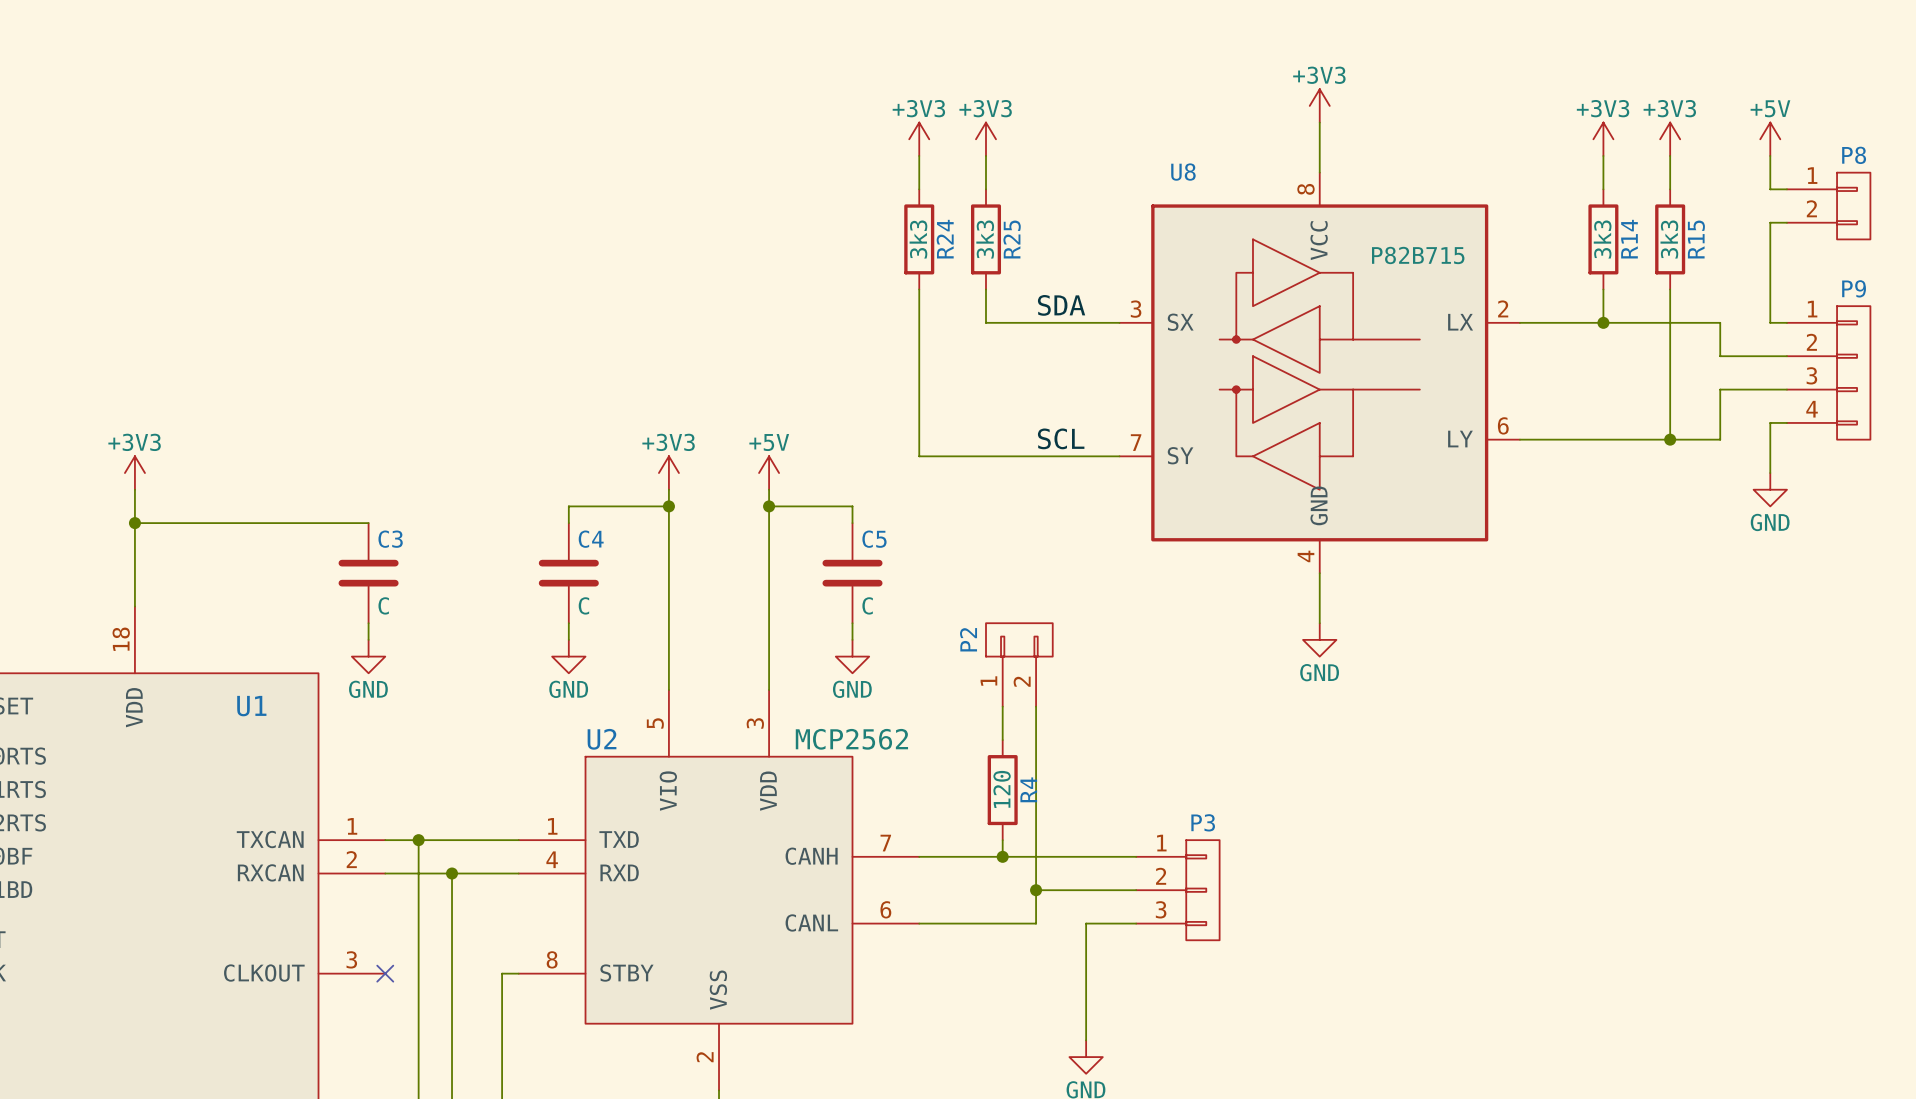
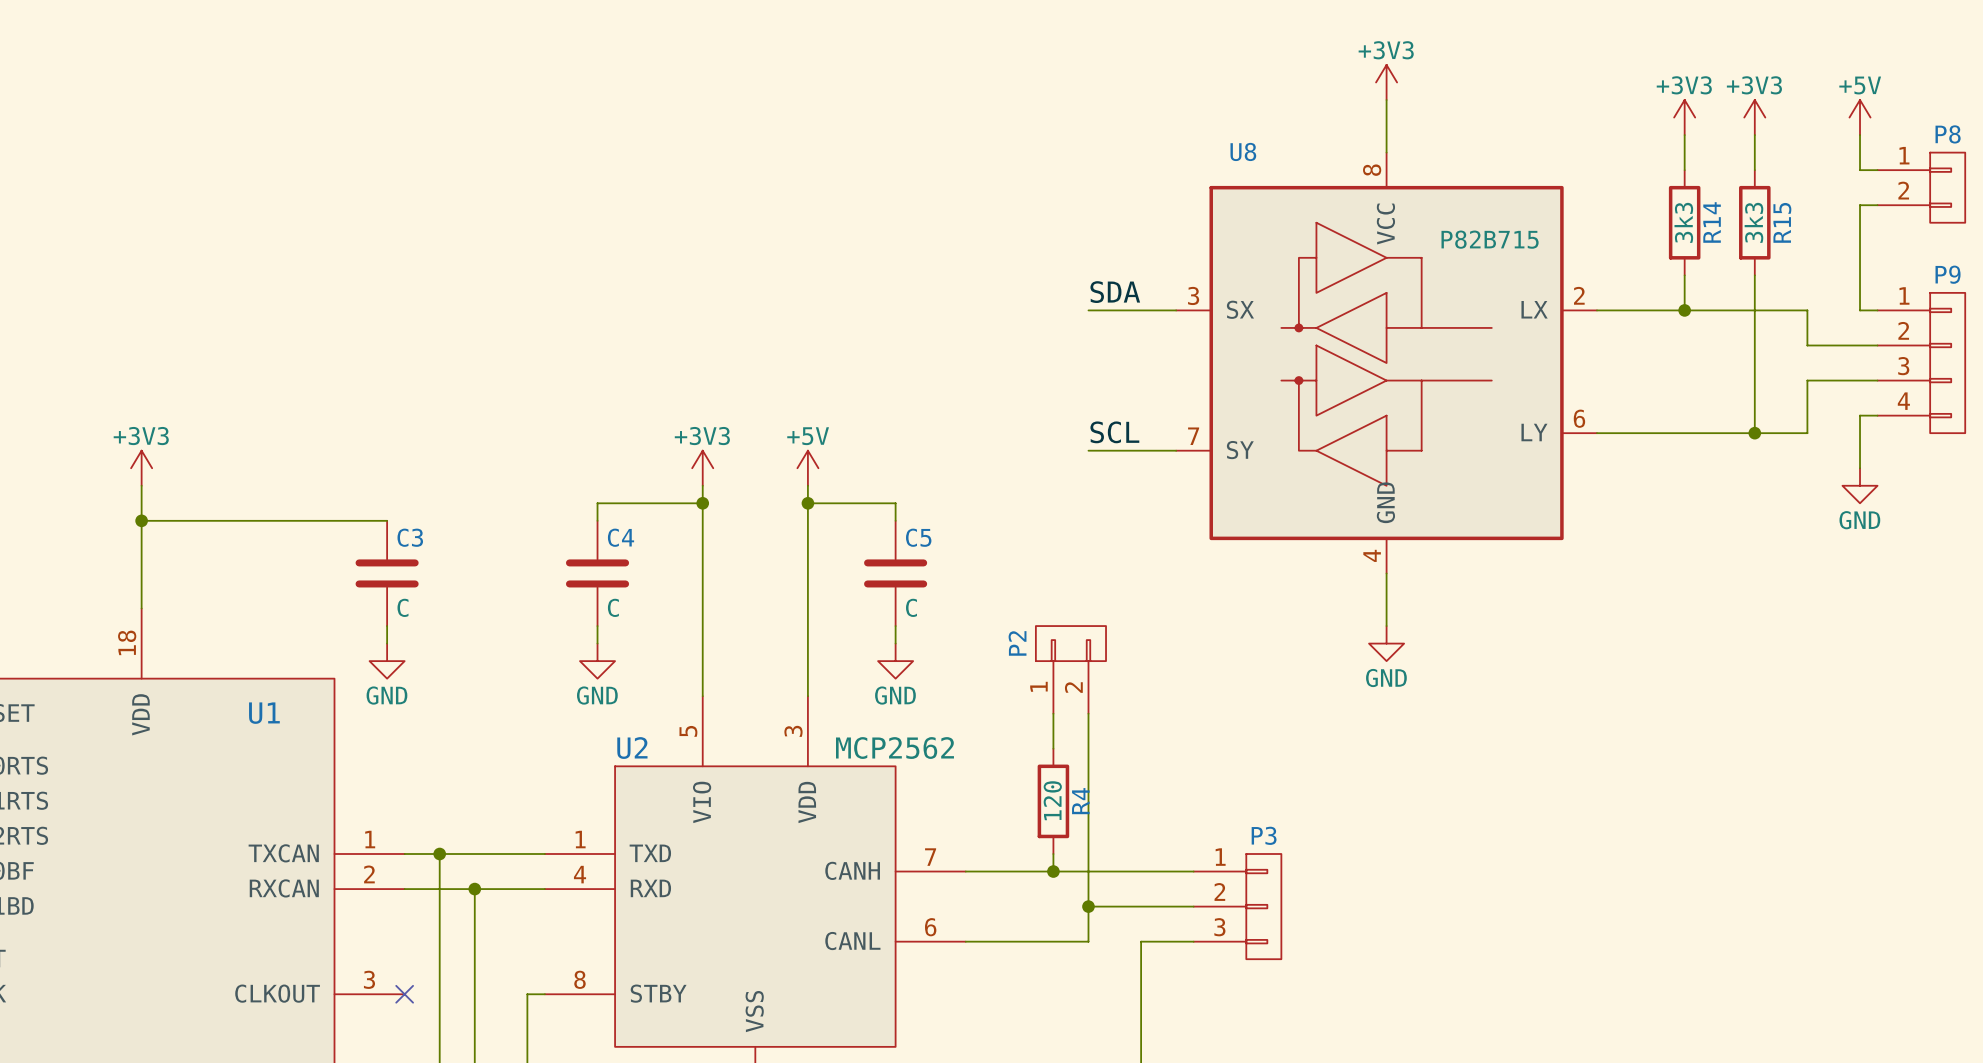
power symbol: +3V3 (919, 139) -> none
power symbol: +3V3 (986, 139) -> none
wire: (919, 155) (919, 189) -> none
wire: (986, 155) (986, 189) -> none
R24: 3k3 (919, 239) -> none
R25: 3k3 (986, 239) -> none
wire: (919, 289) (919, 456) (1036, 456) -> none
wire: (986, 289) (986, 322) (1036, 322) -> none

